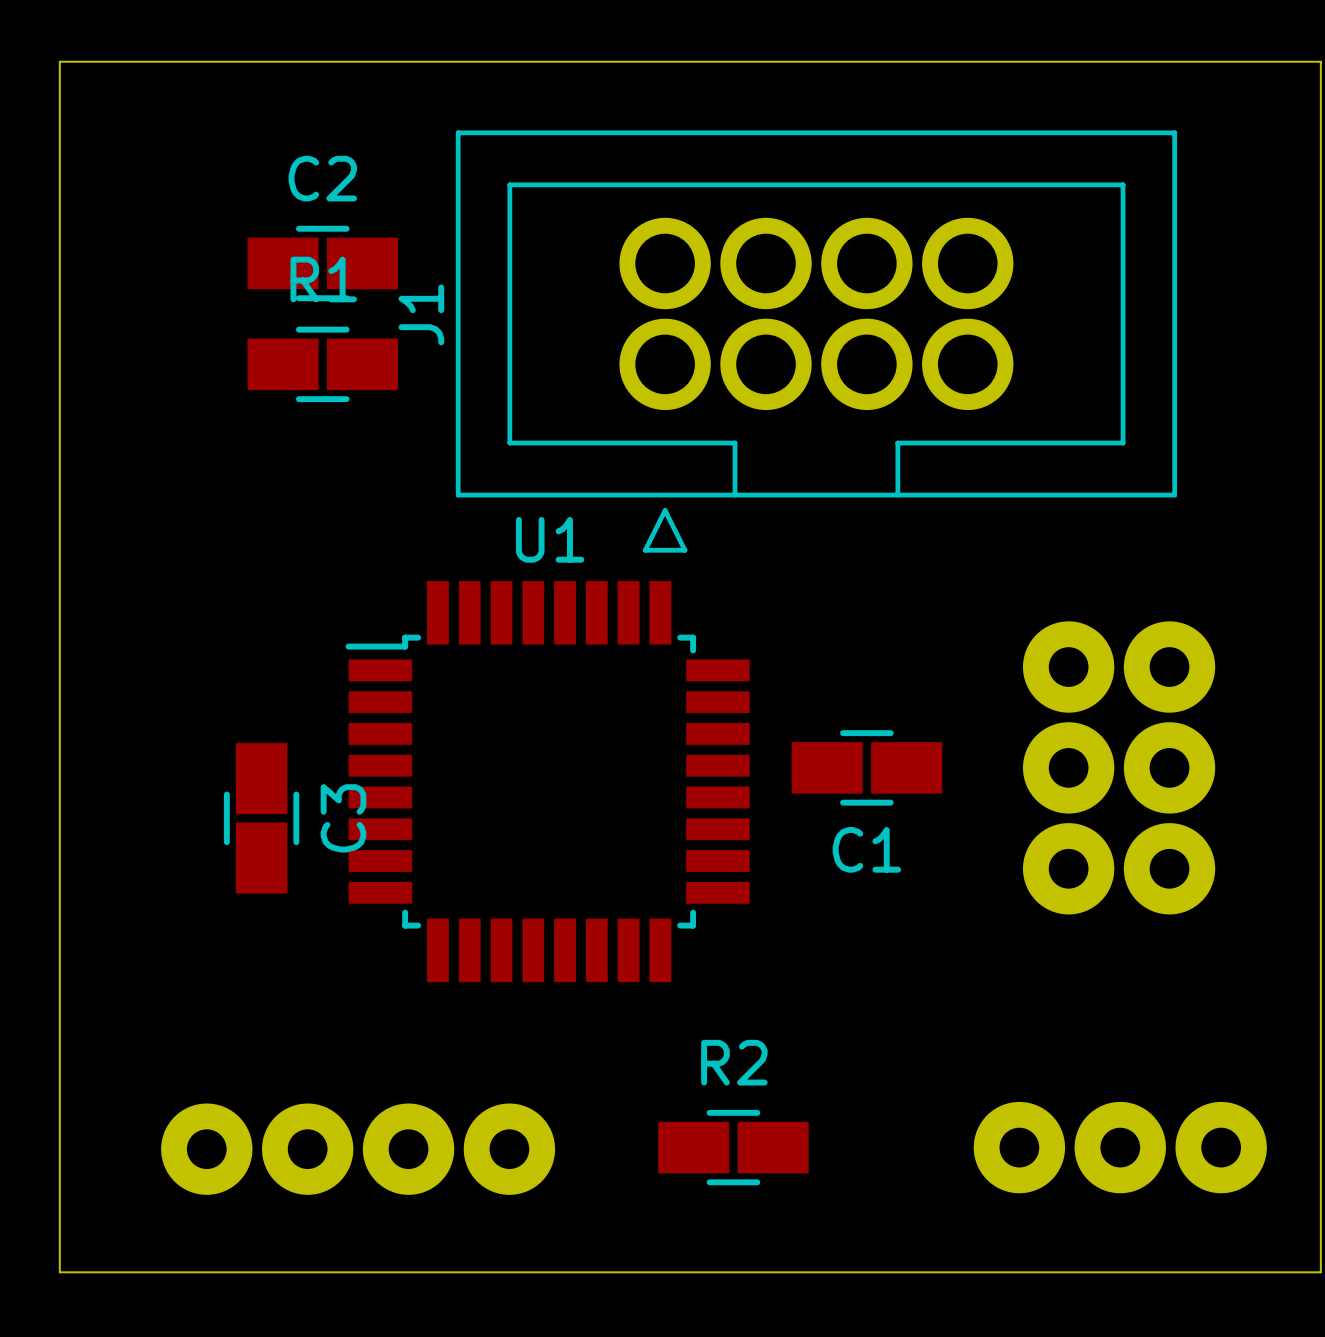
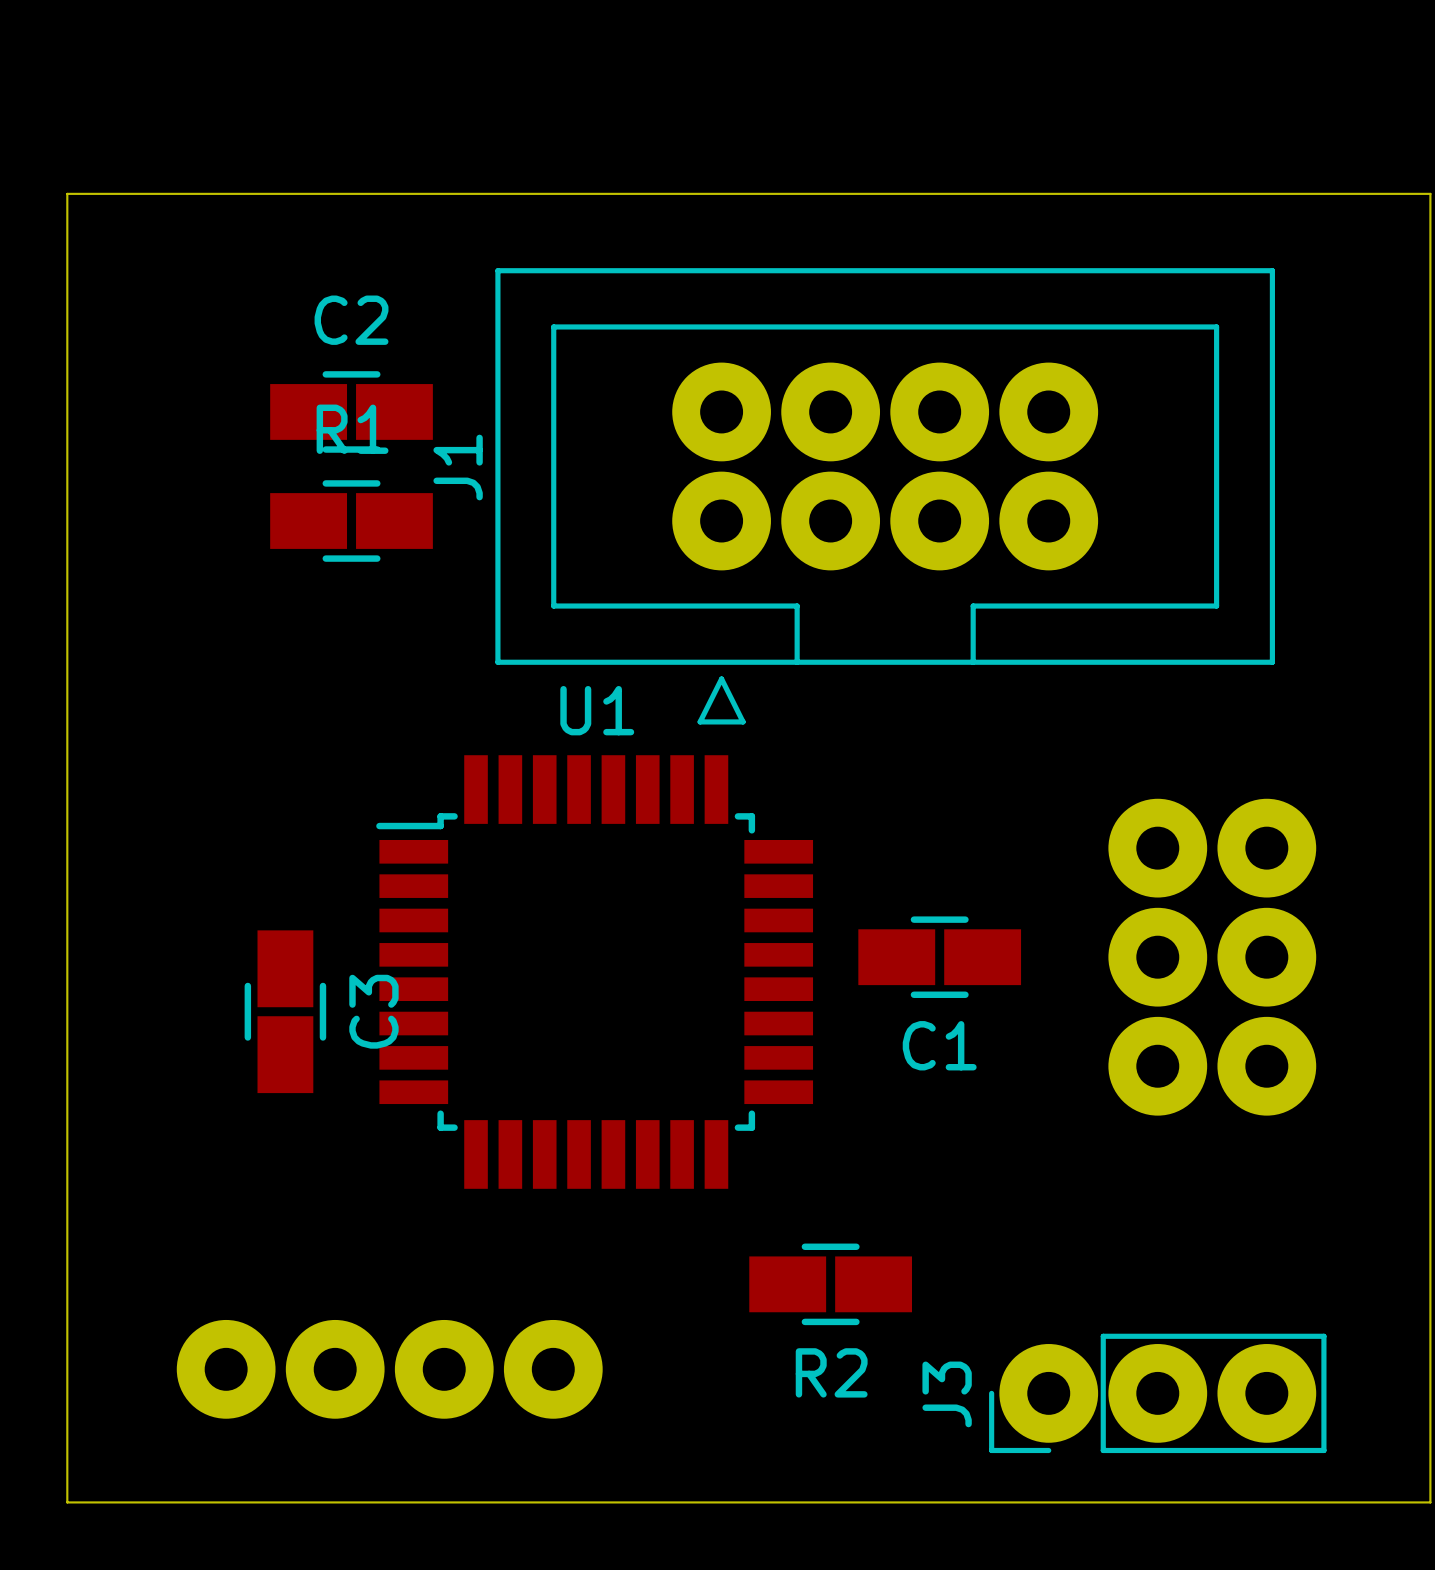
J1 footprint: [455, 130, 1178, 553] -> [495, 268, 1275, 725]
R2 name position: R2 (734, 1062) -> R2 (831, 1372)
R2 position: (733, 1147) -> (830, 1284)
J3 side: bottom (1120, 1147) -> top (1157, 1393)

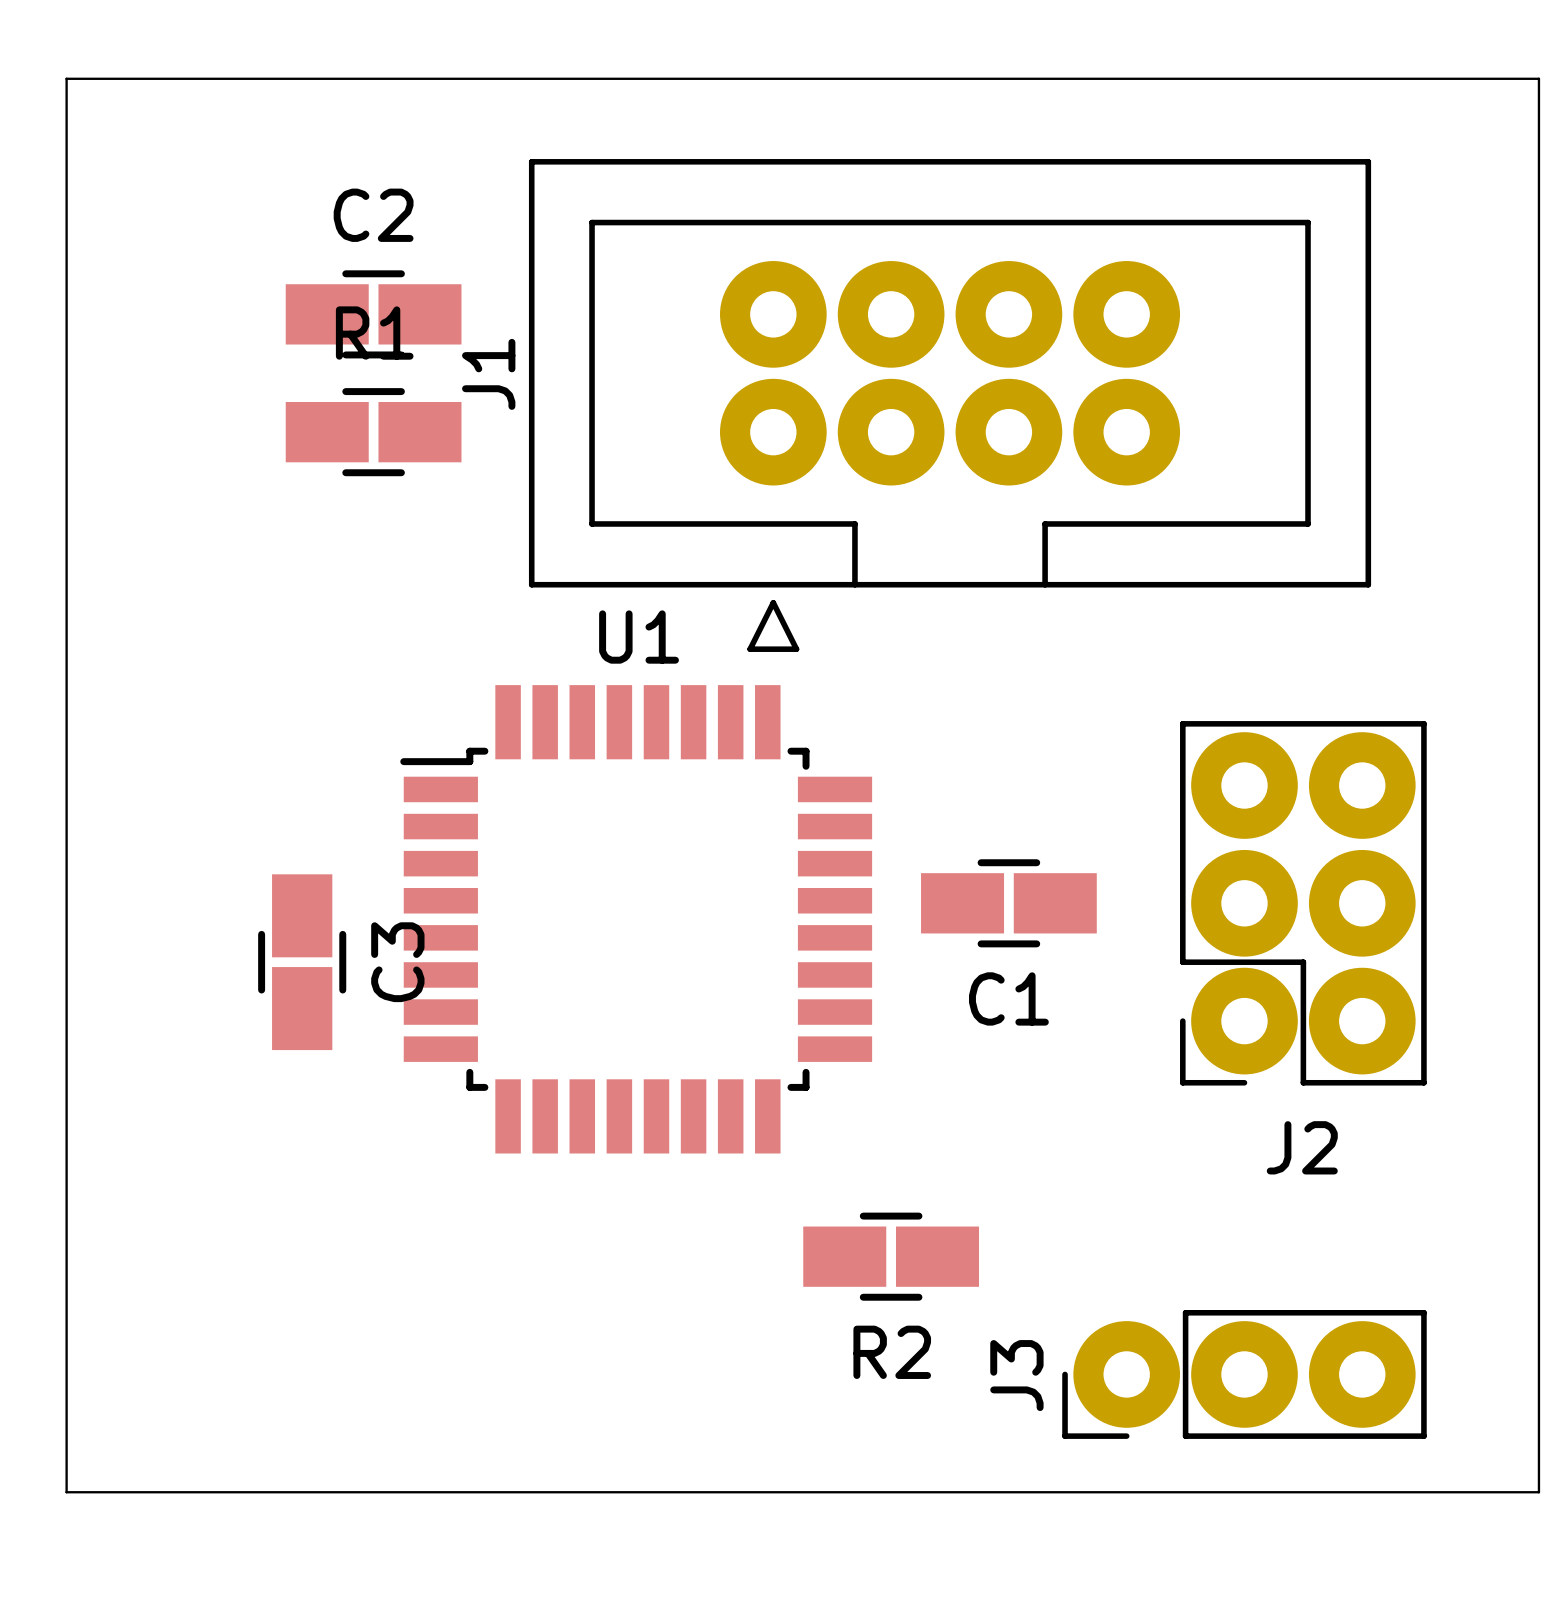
J2 side: bottom (1212, 957) -> top (1303, 903)
part: (389, 1369) -> none

